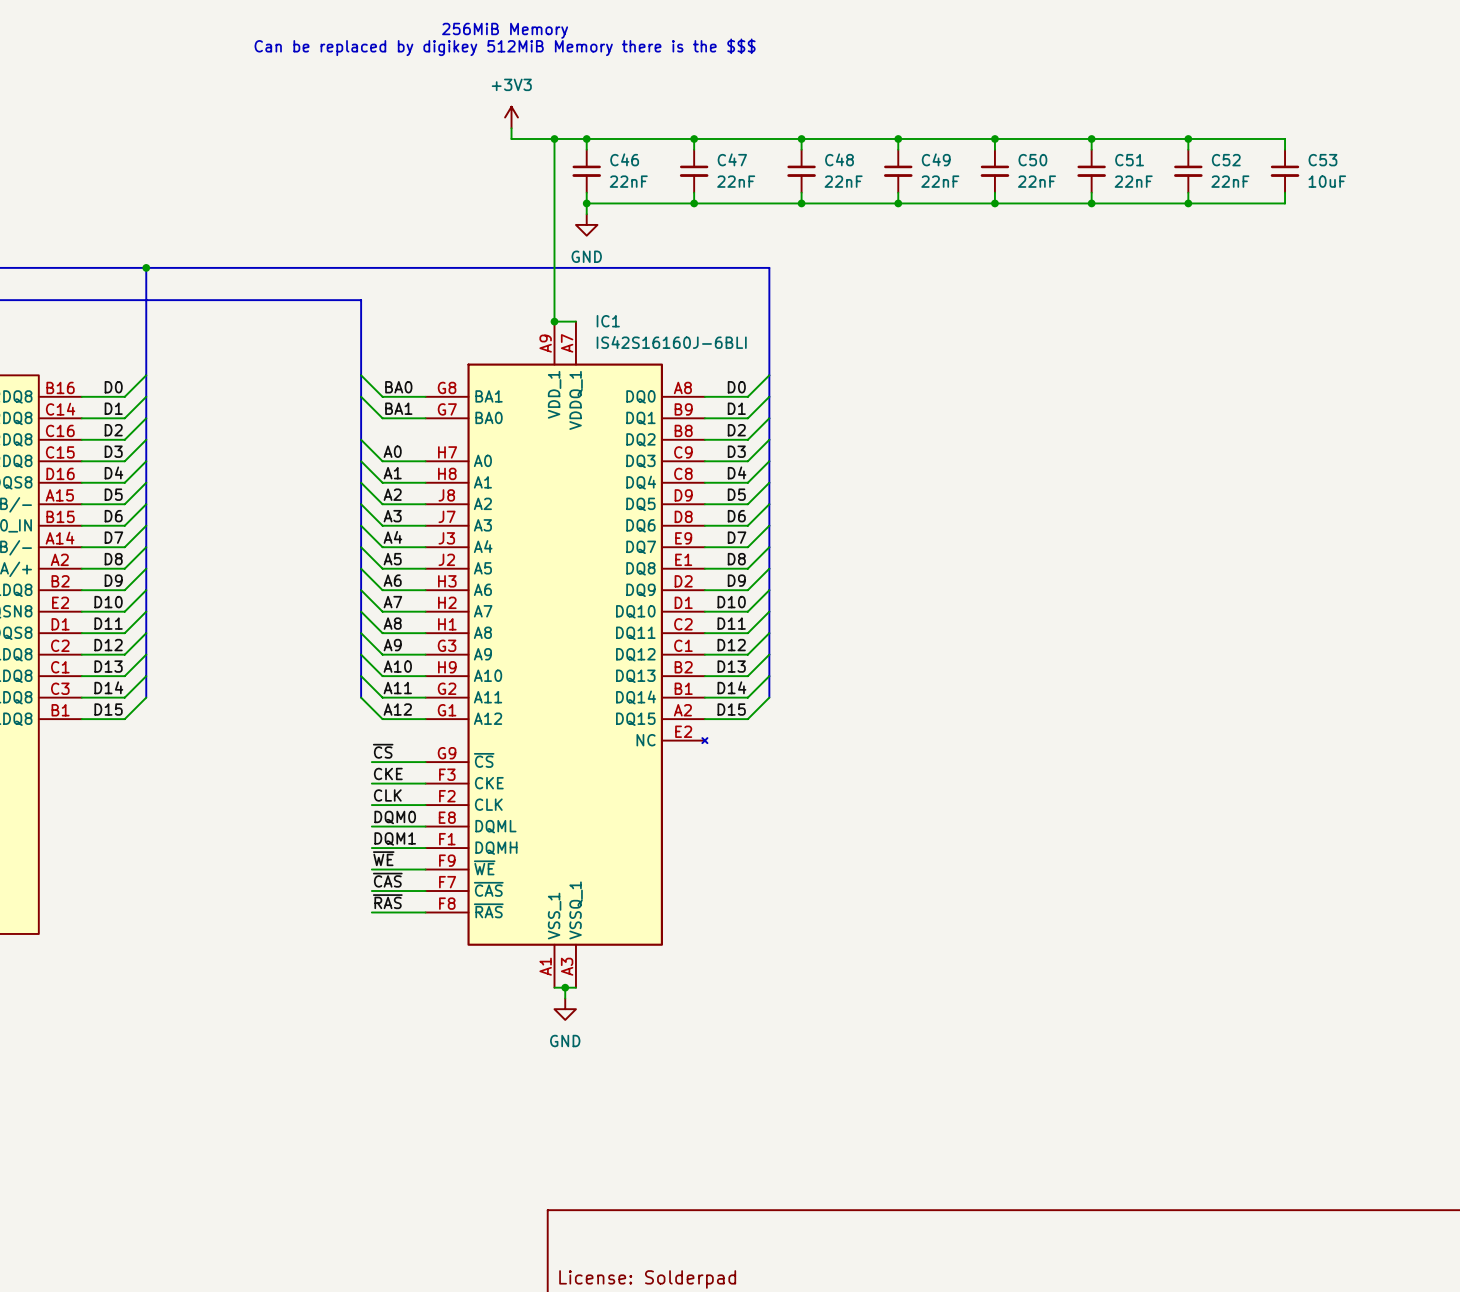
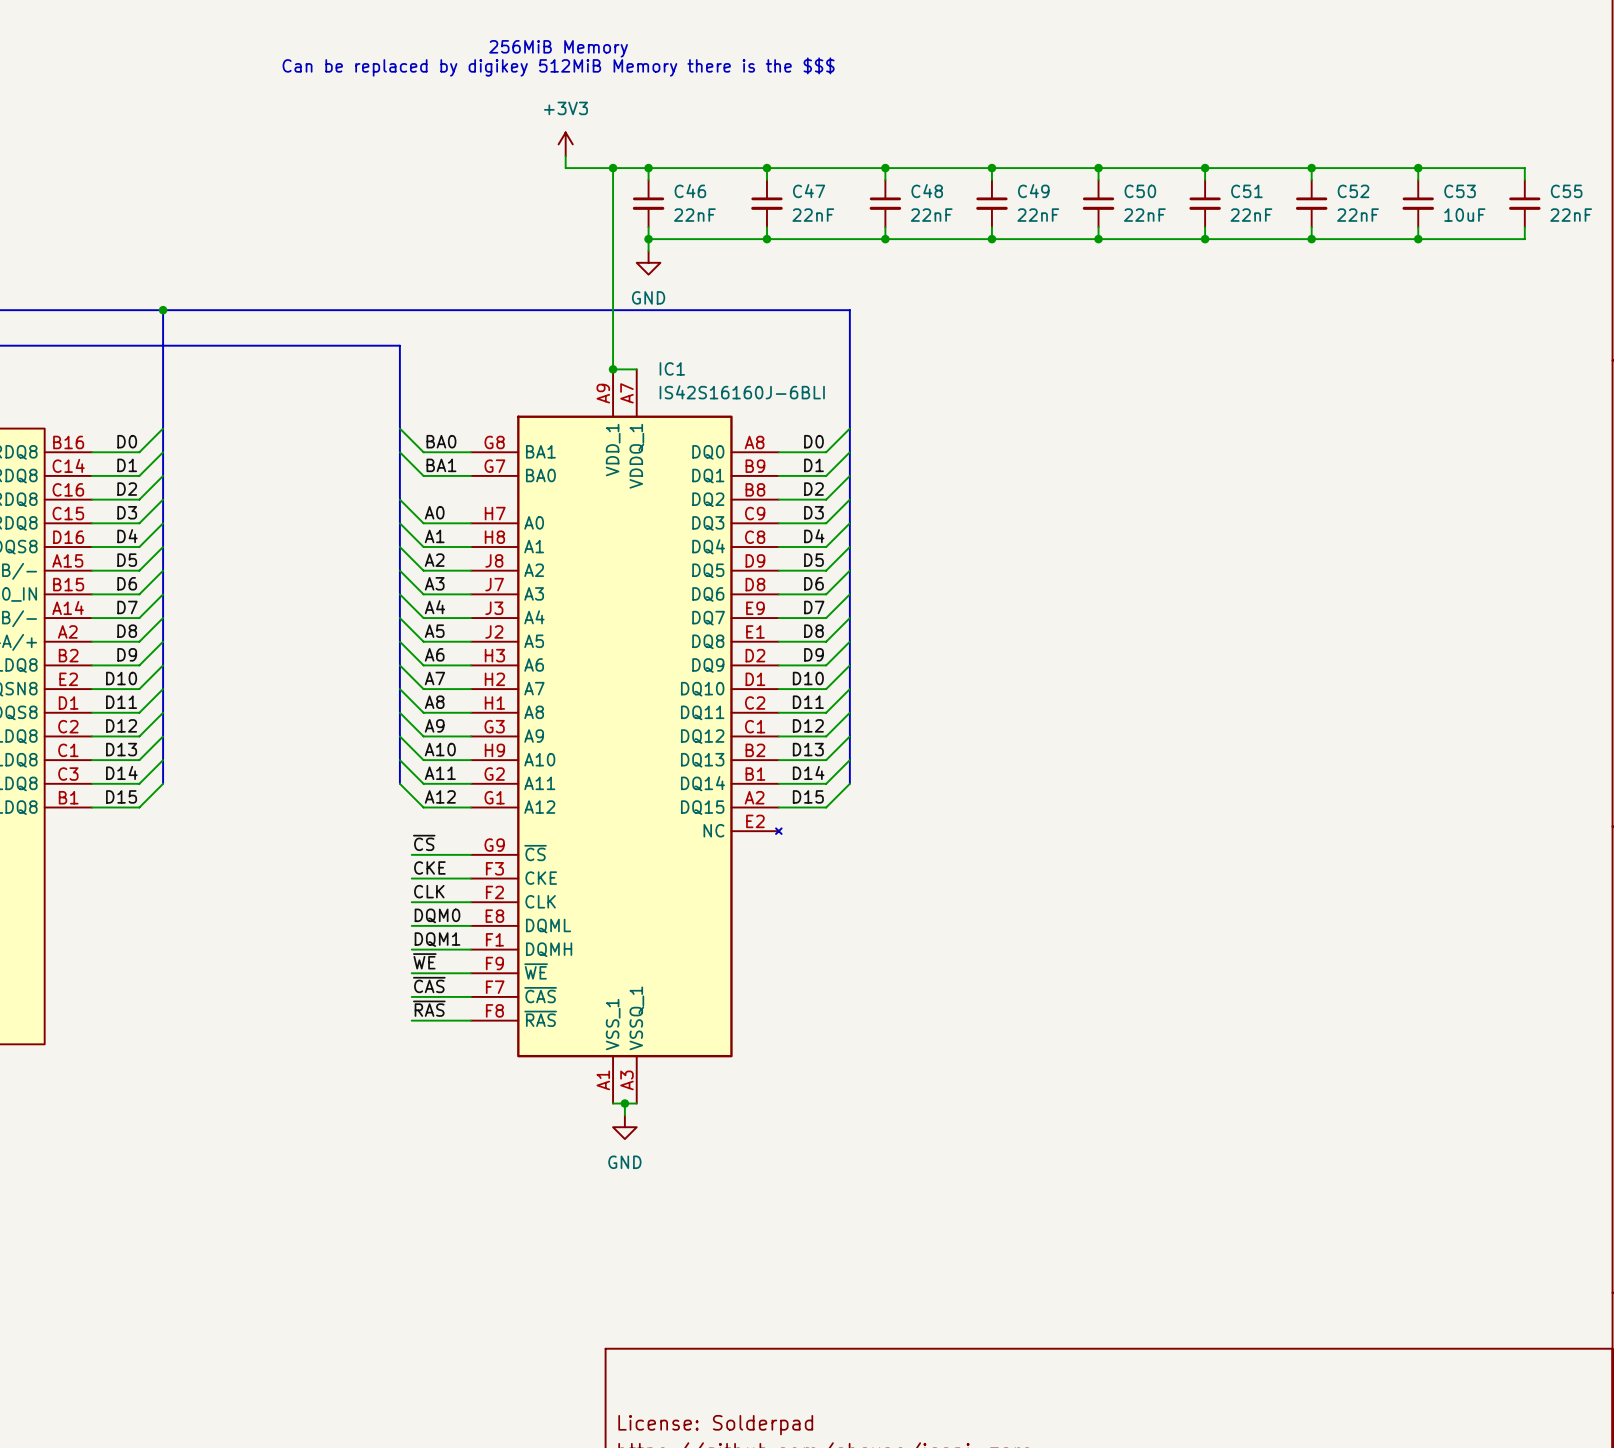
wire: none -> (1418, 168) (1524, 168) (1524, 179)
junction: none -> (1418, 168)
C55: none -> 22nF (1524, 203)
wire: none -> (1524, 227) (1524, 239) (1418, 239)
junction: none -> (1418, 239)

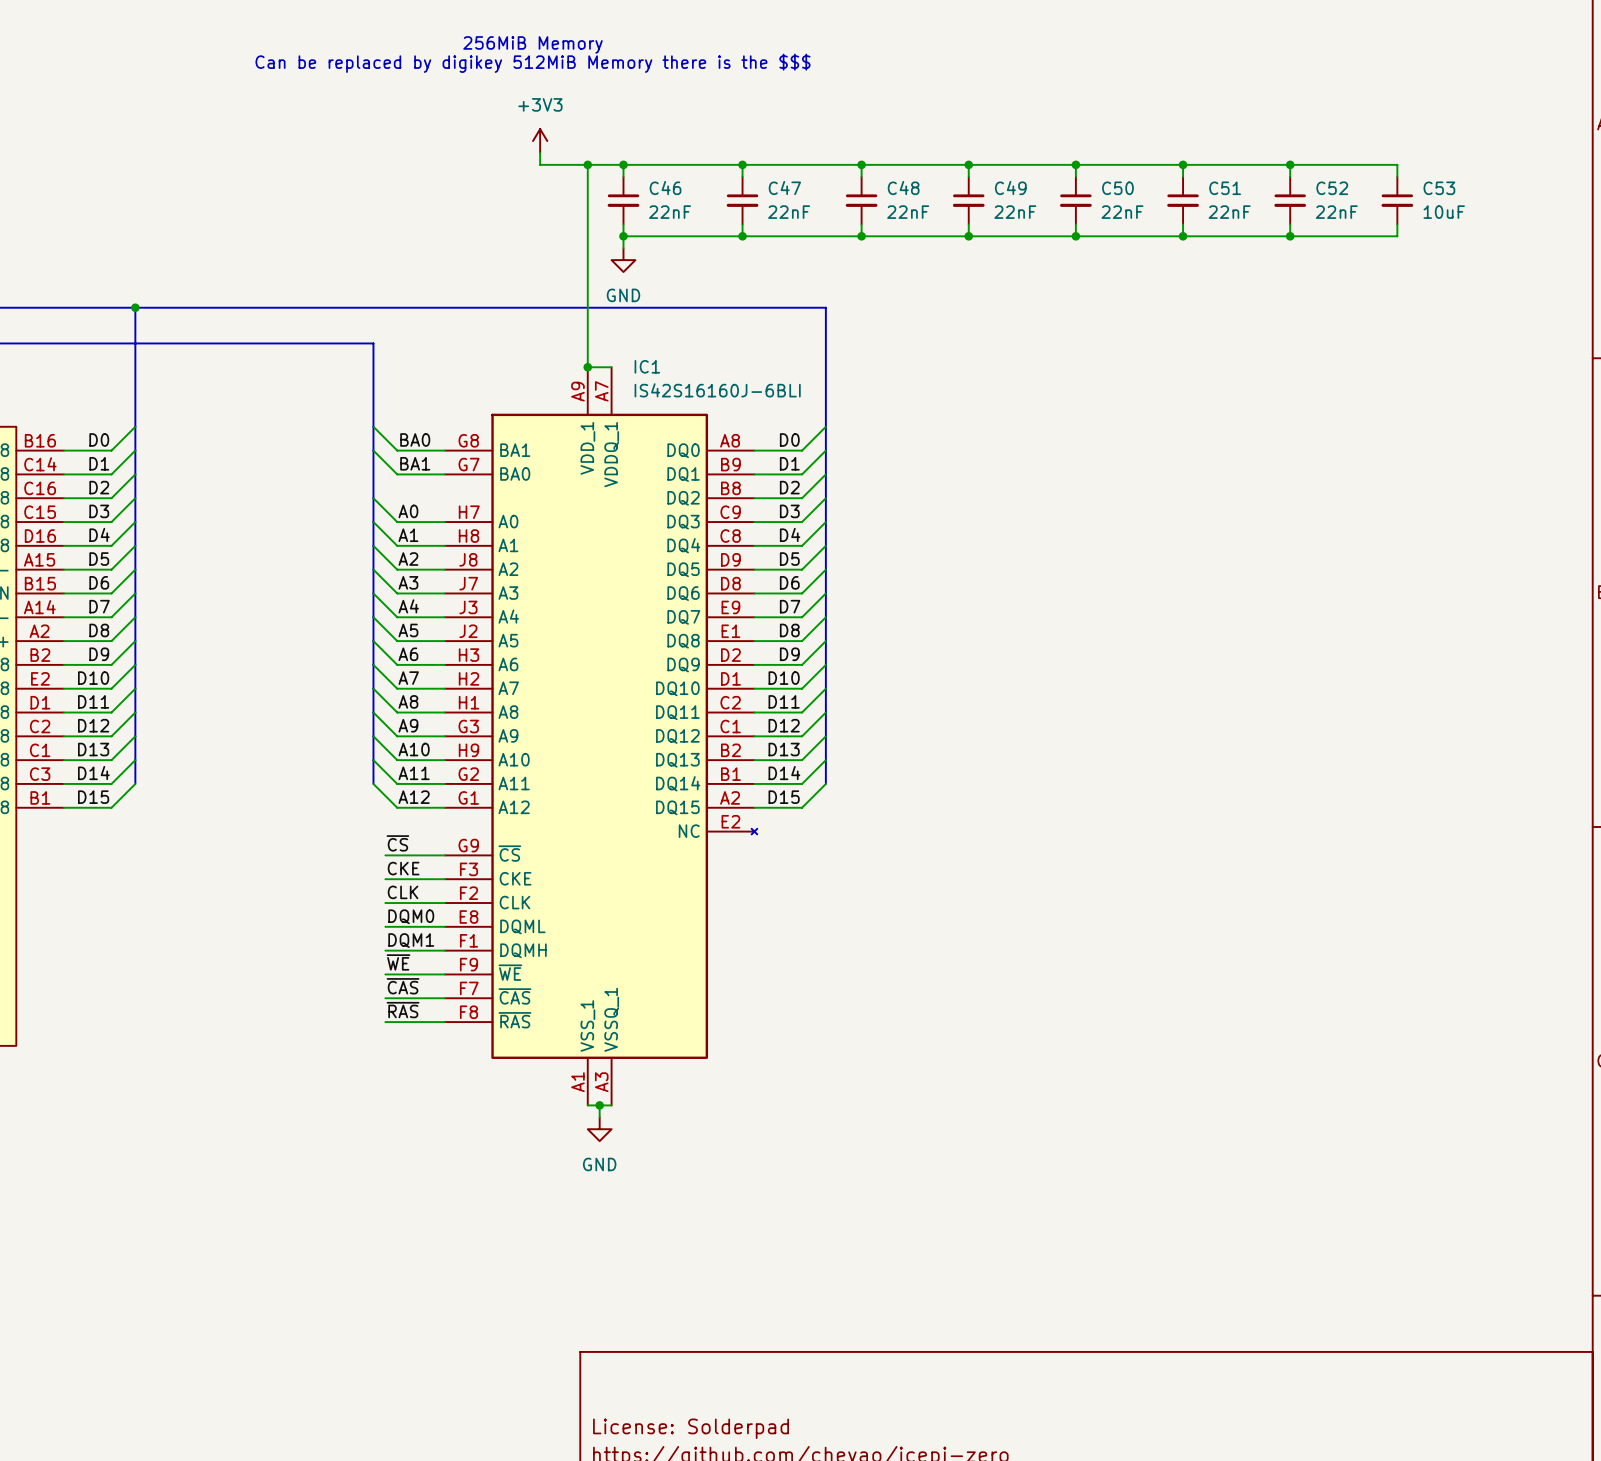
wire: (1418, 168) (1524, 168) (1524, 179) -> none
junction: (1418, 168) -> none
C55: 22nF (1524, 203) -> none
wire: (1524, 227) (1524, 239) (1418, 239) -> none
junction: (1418, 239) -> none

